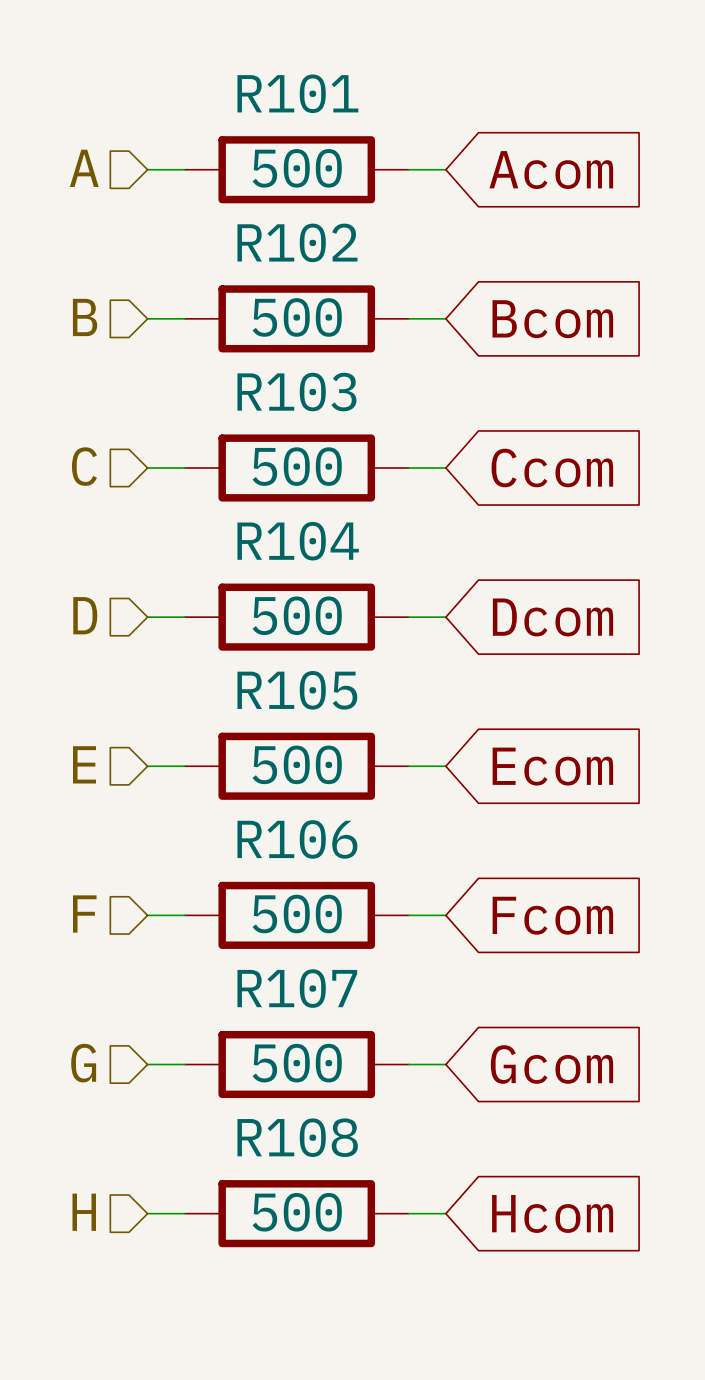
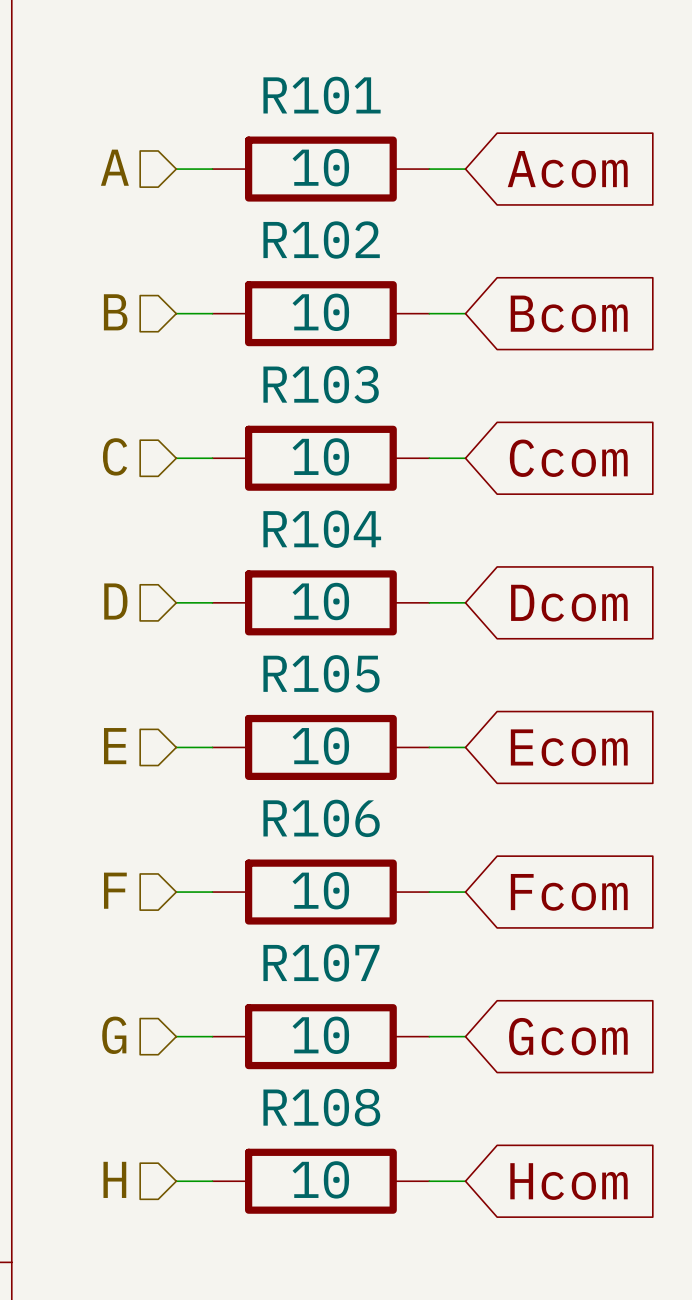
R101 value: 500 (297, 168) -> 10 (320, 167)
R102 value: 500 (297, 317) -> 10 (320, 312)
R103 value: 500 (297, 466) -> 10 (320, 456)
R104 value: 500 (297, 615) -> 10 (320, 601)
R105 value: 500 (297, 764) -> 10 (320, 746)
R106 value: 500 (297, 913) -> 10 (320, 890)
R107 value: 500 (297, 1063) -> 10 (320, 1035)
R108 value: 500 (297, 1212) -> 10 (320, 1179)

